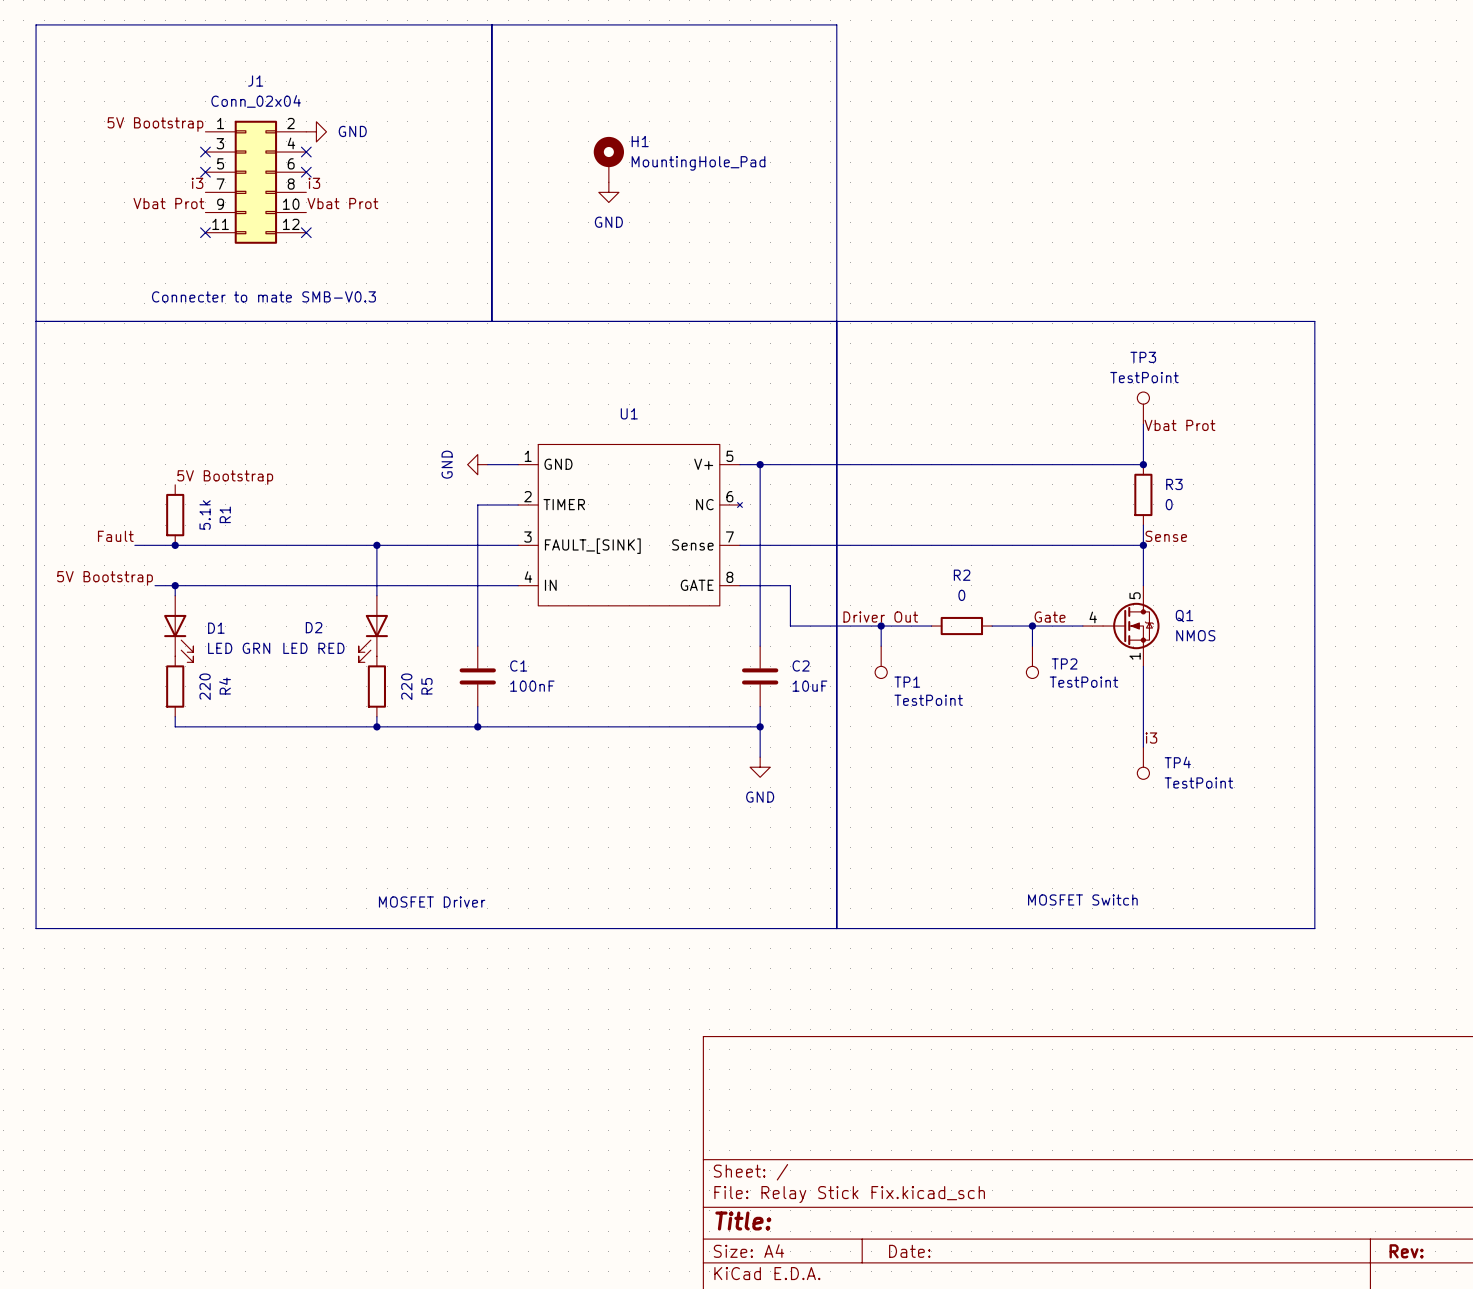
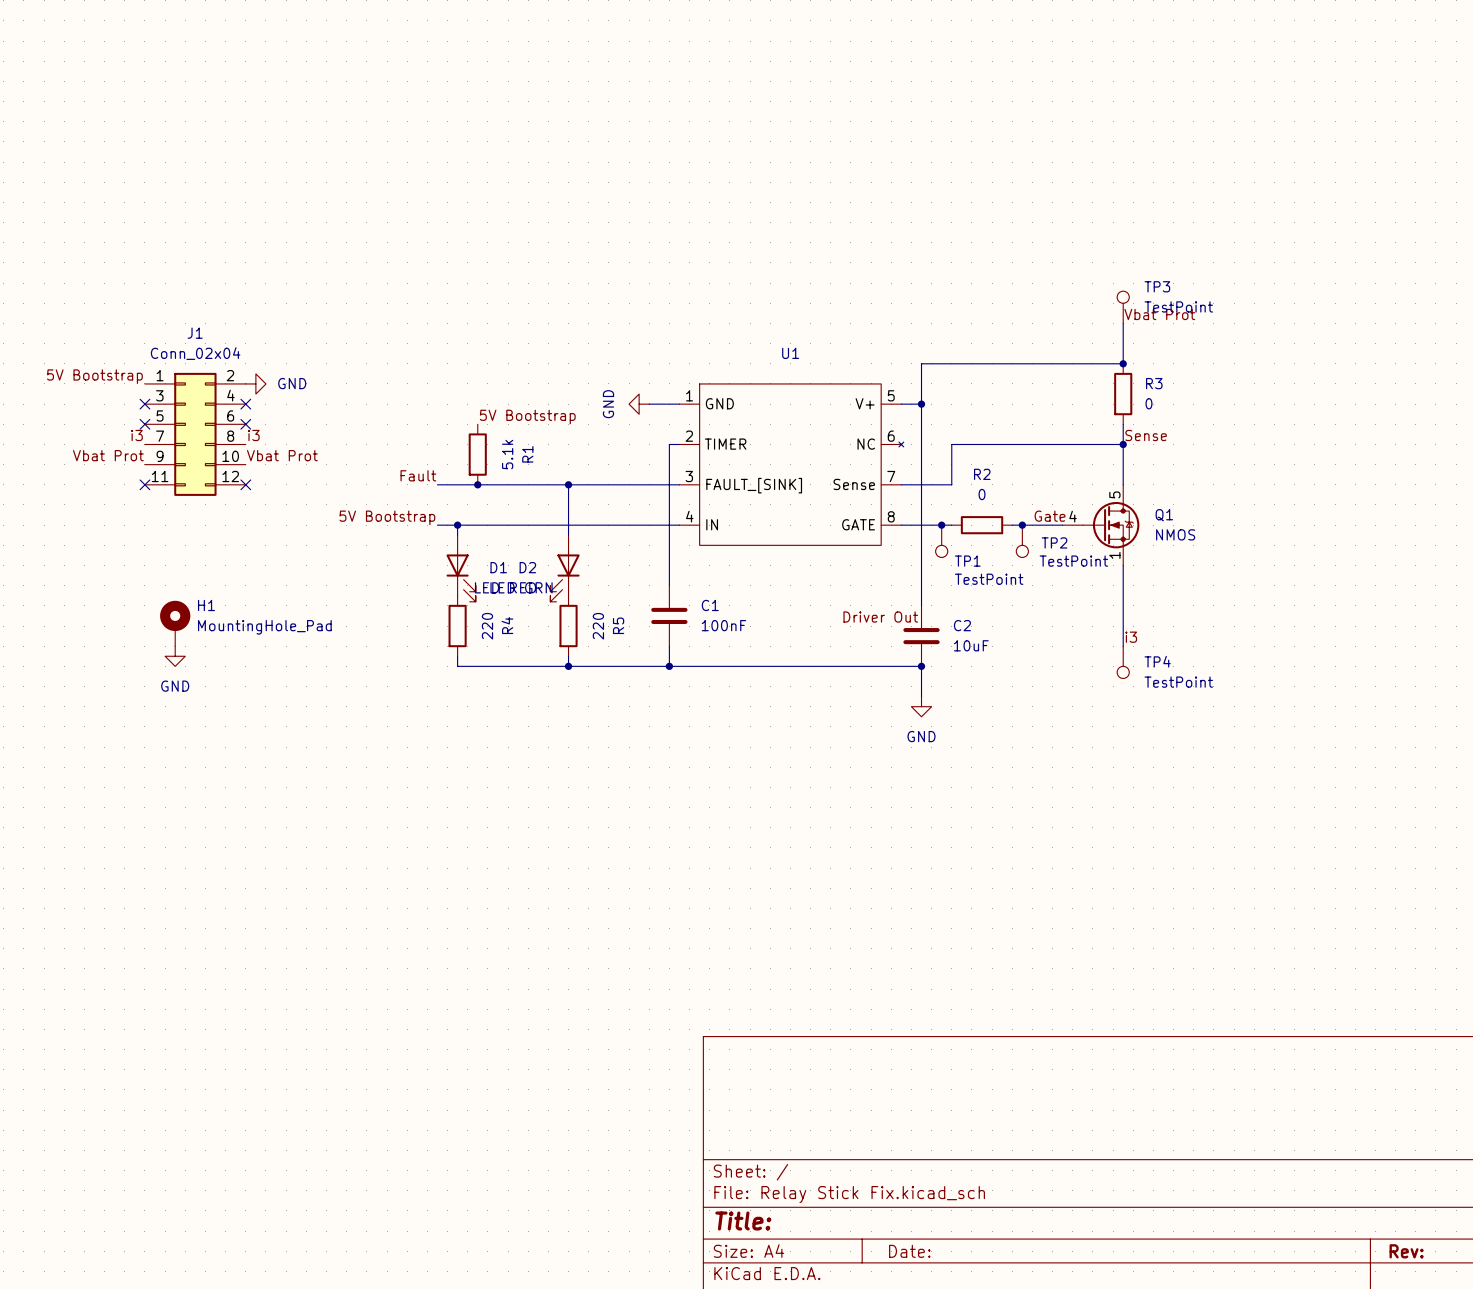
line: (491, 24) (491, 321) -> none
label: 5V Bootstrap (155, 124) -> none
power symbol: GND (316, 131) -> none
no-connect mark: (205, 152) -> none
no-connect mark: (306, 152) -> none
H1 position: (608, 159) -> (175, 623)
no-connect mark: (205, 172) -> none
no-connect mark: (306, 172) -> none
J1 position: (255, 182) -> (195, 434)
label: i3 (197, 183) -> none
label: i3 (314, 183) -> none
power symbol: GND (608, 192) -> none
label: Vbat Prot (168, 203) -> none
label: Vbat Prot (342, 203) -> none
no-connect mark: (205, 232) -> none
no-connect mark: (306, 232) -> none
text: Connecter to mate SMB-V0.3 (263, 296) -> none
line: (36, 321) (1314, 321) (1314, 928) (36, 928) (36, 24) (836, 24) (836, 928) -> none
wire: none -> (1123, 323) (1123, 363) (921, 363) (921, 605)
TP3 name position: TP3 (1143, 357) -> TP3 (1157, 286)
junction: none -> (1123, 363)
label: none -> 5V Bootstrap (94, 376)
TP3 value position: TestPoint (1144, 377) -> TestPoint (1178, 306)
power symbol: none -> GND (255, 383)
no-connect mark: none -> (144, 404)
no-connect mark: none -> (245, 404)
power symbol: none -> GND (639, 404)
wire: none -> (901, 404) (921, 404)
junction: none -> (921, 404)
TP3 position: (1143, 408) -> (1123, 307)
label: none -> 5V Bootstrap (527, 416)
no-connect mark: none -> (144, 424)
no-connect mark: none -> (245, 424)
wire: (1143, 424) (1143, 464) (739, 464) -> none
label position: Vbat Prot (1179, 425) -> Vbat Prot (1159, 314)
label: none -> i3 (136, 435)
label: none -> i3 (253, 435)
wire: none -> (679, 444) (669, 444) (669, 585)
wire: none -> (1123, 444) (951, 444) (951, 484) (901, 484)
label: none -> Vbat Prot (108, 455)
label: none -> Vbat Prot (282, 455)
power symbol: GND (477, 464) -> none
wire: (487, 464) (518, 464) -> (649, 404) (679, 404)
wire: (760, 464) (760, 646) -> none
junction: (760, 464) -> none
junction position: (1143, 464) -> (1123, 444)
label: none -> Fault (418, 475)
label: 5V Bootstrap (225, 477) -> none
no-connect mark: none -> (144, 484)
no-connect mark: none -> (245, 484)
wire: none -> (437, 484) (679, 484)
junction: none -> (477, 484)
wire: none -> (568, 484) (568, 535)
junction: none -> (568, 484)
R3 position: (1143, 494) -> (1123, 394)
wire: (518, 504) (477, 504) (477, 646) -> none
R1 position: (175, 515) -> (477, 454)
label: none -> 5V Bootstrap (387, 517)
wire: none -> (437, 525) (679, 525)
wire: none -> (457, 525) (457, 535)
junction: none -> (457, 525)
U1 position: (630, 525) -> (791, 464)
wire: none -> (901, 525) (951, 525)
junction: none -> (941, 525)
wire: none -> (1012, 525) (1062, 525)
junction: none -> (1022, 525)
wire: (1143, 525) (1143, 585) -> (1123, 424) (1123, 484)
label: Fault (115, 536) -> none
label position: Sense (1166, 536) -> Sense (1146, 435)
wire: (134, 545) (518, 545) -> none
junction: (175, 545) -> none
wire: (376, 545) (376, 595) -> none
junction: (376, 545) -> none
wire: (739, 545) (1143, 545) -> none
junction: (1143, 545) -> none
label: 5V Bootstrap (105, 578) -> none
wire: (155, 585) (518, 585) -> none
wire: (175, 585) (175, 595) -> none
junction: (175, 585) -> none
wire: (739, 585) (790, 585) (790, 626) (931, 626) -> none
label position: Gate (1050, 617) -> Gate (1050, 516)
wire: (881, 626) (881, 646) -> none
junction: (881, 626) -> none
R2 position: (961, 626) -> (982, 525)
wire: (992, 626) (1082, 626) -> none
wire: (1032, 626) (1032, 646) -> none
junction: (1032, 626) -> none
Q1 position: (1121, 626) -> (1101, 525)
D2 name position: D2 (314, 627) -> D2 (527, 567)
D1 position: (178, 629) -> (461, 568)
D2 position: (373, 629) -> (565, 568)
wire: none -> (669, 646) (669, 666)
power symbol: none -> GND (175, 656)
wire: none -> (457, 656) (457, 666) (921, 666) (921, 696)
wire: none -> (568, 656) (568, 666)
TP1 position: (881, 662) -> (941, 541)
TP2 position: (1032, 662) -> (1022, 541)
junction: none -> (568, 666)
junction: none -> (669, 666)
junction: none -> (921, 666)
wire: (1143, 666) (1143, 747) -> (1123, 565) (1123, 646)
C1 position: (477, 676) -> (669, 615)
C2 position: (760, 676) -> (921, 636)
R4 position: (175, 686) -> (457, 626)
R5 position: (376, 686) -> (568, 626)
wire: (477, 706) (477, 726) -> none
wire: (760, 706) (760, 757) -> none
wire: (175, 716) (175, 726) (760, 726) -> none
wire: (376, 716) (376, 726) -> none
junction: (376, 726) -> none
junction: (477, 726) -> none
junction: (760, 726) -> none
label position: i3 (1151, 738) -> i3 (1131, 637)
TP4 position: (1143, 763) -> (1123, 662)
power symbol position: GND (760, 767) -> GND (921, 706)
text: MOSFET Switch (1082, 899) -> none
text: MOSFET Driver (432, 902) -> none

